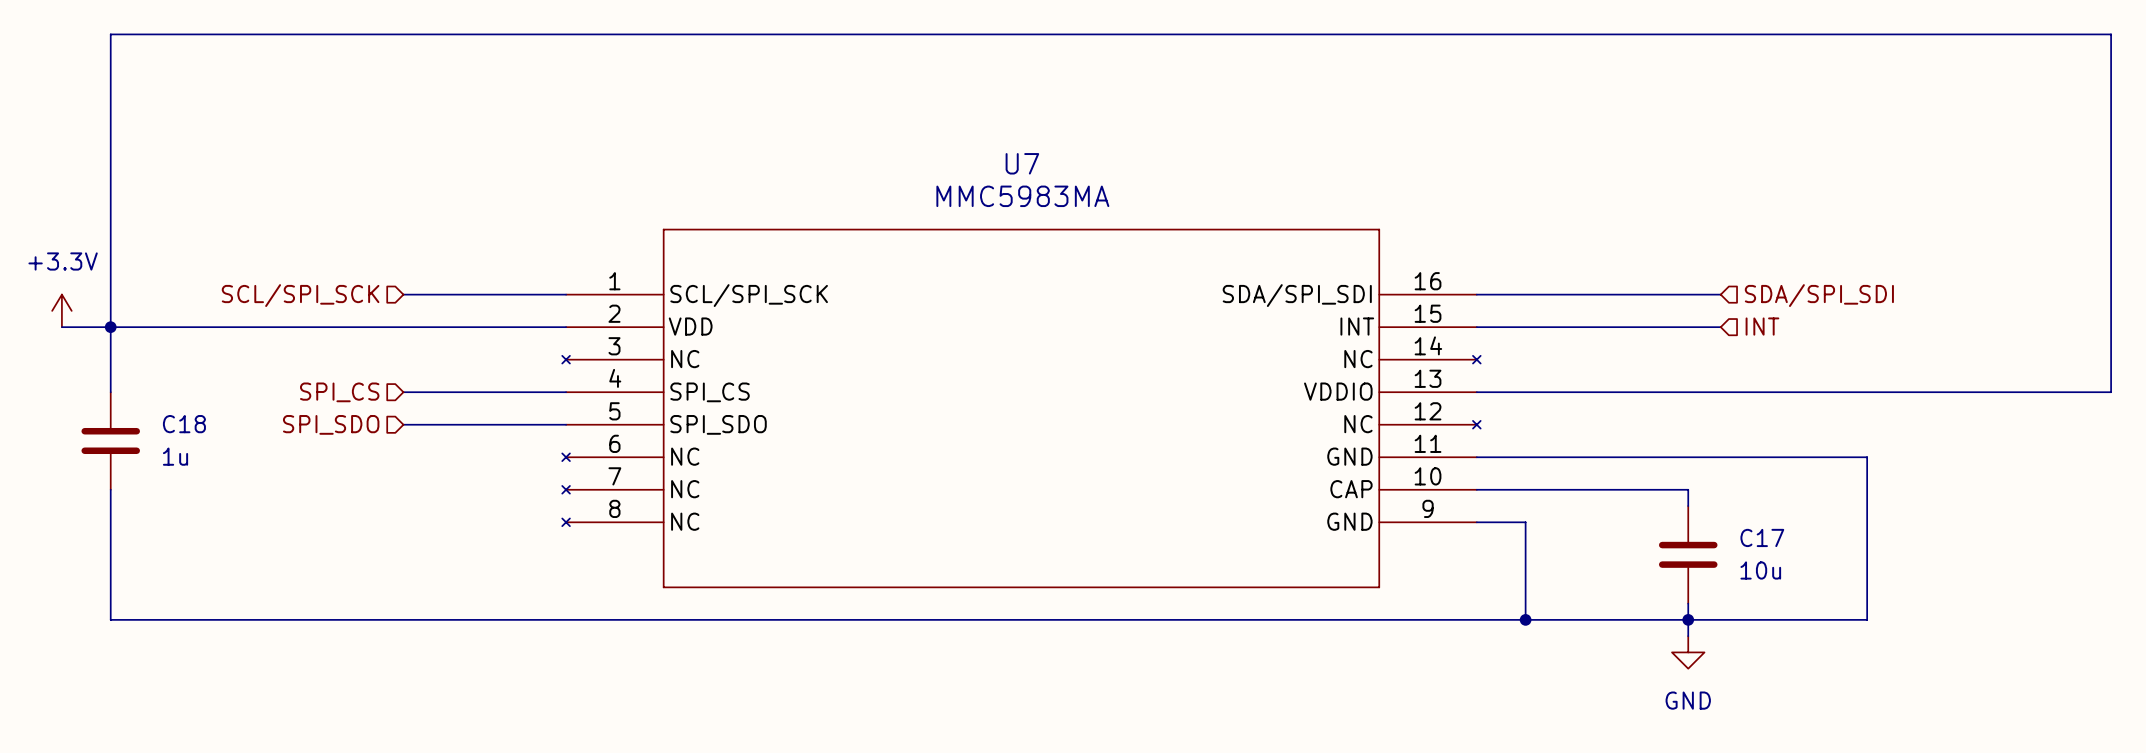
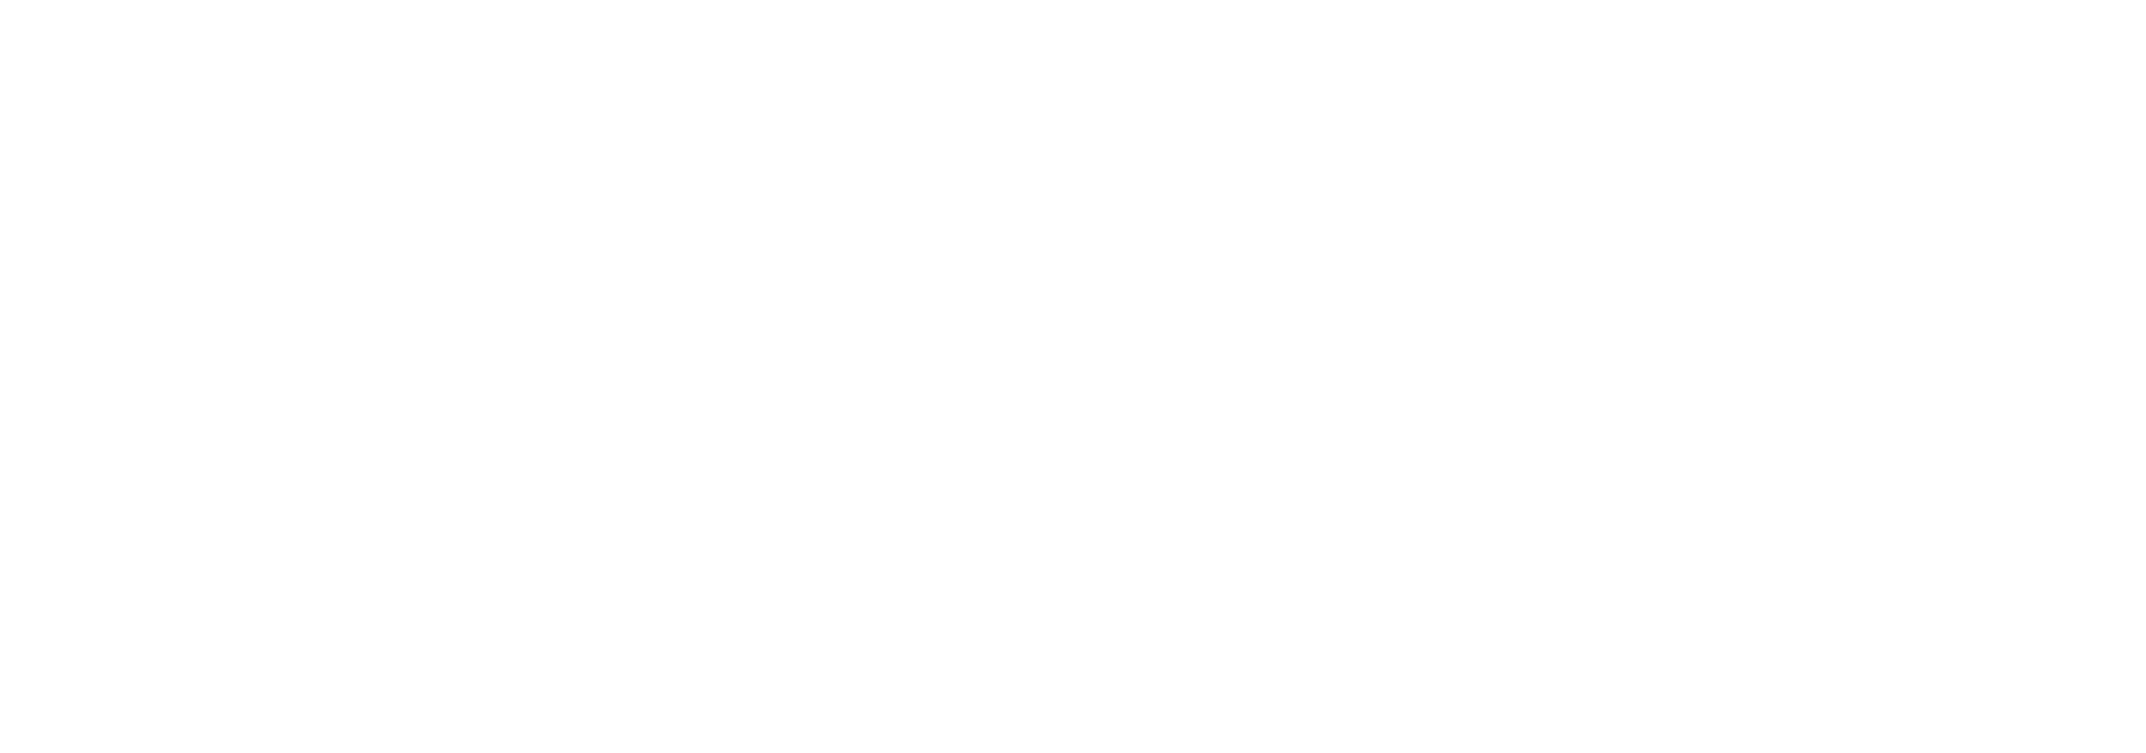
wire: (403, 294) (566, 294) -> none
wire: (1476, 294) (1720, 294) -> none
hierarchical label: SCL/SPI_SCK (300, 295) -> none
hierarchical label: SDA/SPI_SDI (1819, 295) -> none
power symbol: +3.3V (61, 310) -> none
hierarchical label: INT (1762, 326) -> none
wire: (61, 327) (566, 327) -> none
junction: (110, 327) -> none
wire: (1476, 327) (1720, 327) -> none
wire: (110, 392) (110, 34) (2111, 34) (2111, 392) (1476, 392) -> none
hierarchical label: SPI_CS (339, 392) -> none
wire: (403, 392) (566, 392) -> none
U7: MMC5983MA (1021, 408) -> none
hierarchical label: SPI_SDO (331, 424) -> none
wire: (403, 424) (566, 424) -> none
C18: 1u (110, 440) -> none
wire: (1476, 457) (1867, 457) (1867, 619) (110, 619) (110, 489) -> none
wire: (1476, 489) (1688, 489) (1688, 506) -> none
wire: (1476, 522) (1525, 522) (1525, 619) -> none
C17: 10u (1688, 554) -> none
wire: (1688, 603) (1688, 636) -> none
junction: (1525, 619) -> none
junction: (1688, 619) -> none
power symbol: GND (1688, 652) -> none

